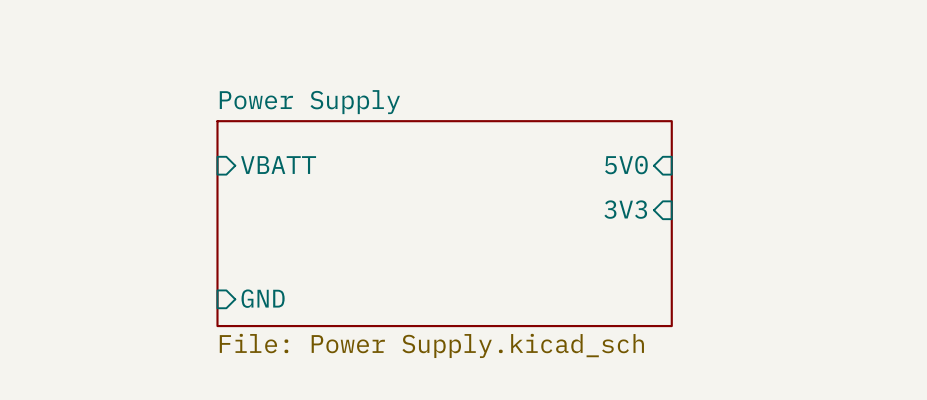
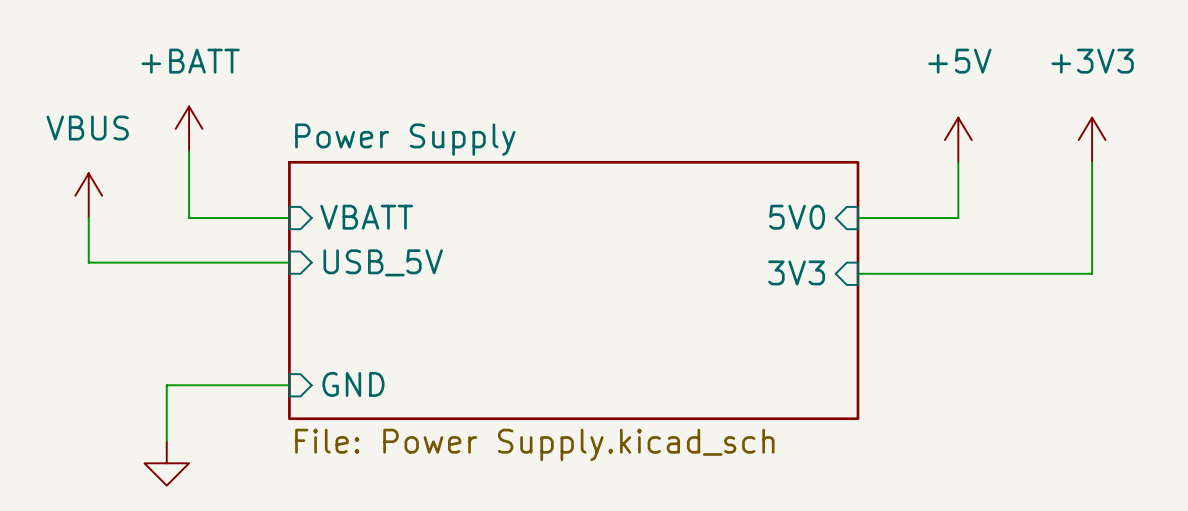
power symbol: none -> +BATT (189, 128)
power symbol: none -> +5V (958, 140)
power symbol: none -> +3V3 (1092, 140)
wire: none -> (189, 151) (189, 218) (289, 218)
wire: none -> (958, 162) (958, 218) (857, 218)
wire: none -> (1092, 162) (1092, 273) (857, 273)
power symbol: none -> VBUS (88, 195)
wire: none -> (88, 218) (88, 262) (289, 262)
sheet pin: none -> USB_5V (383, 262)
wire: none -> (289, 385) (166, 385) (166, 441)
power symbol: none -> (166, 463)

